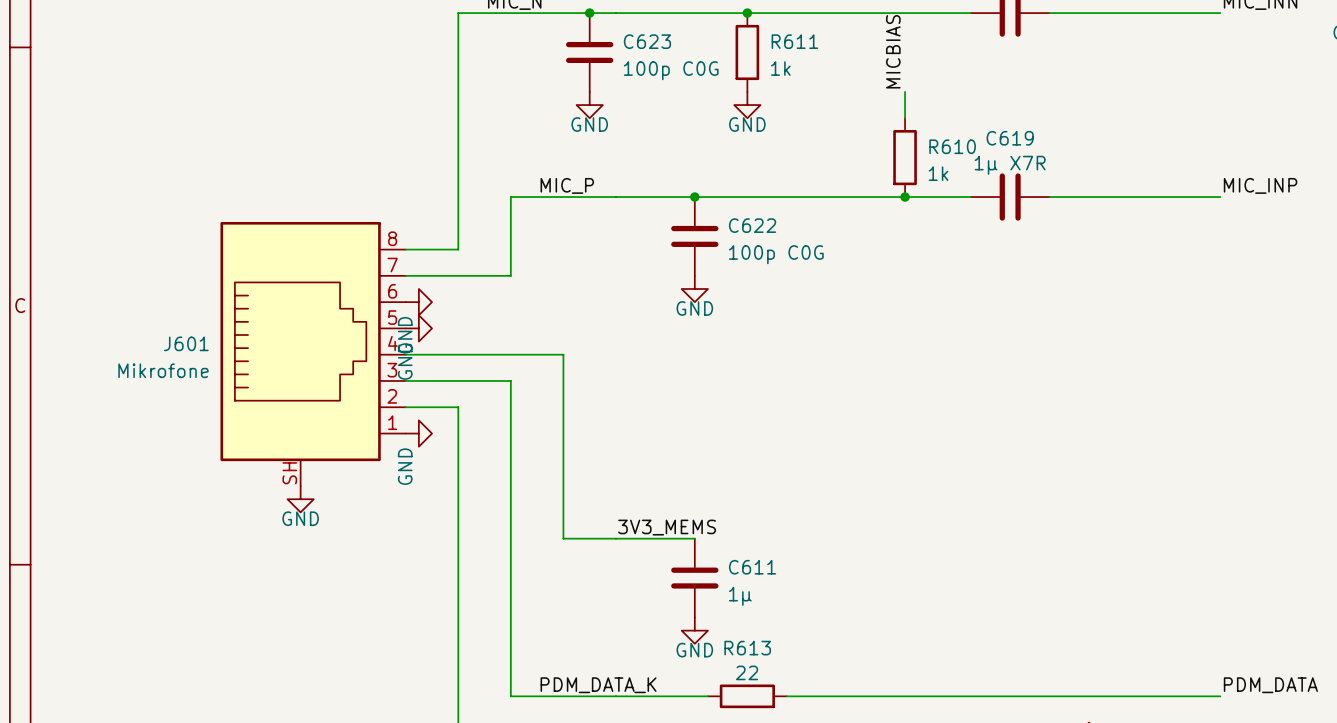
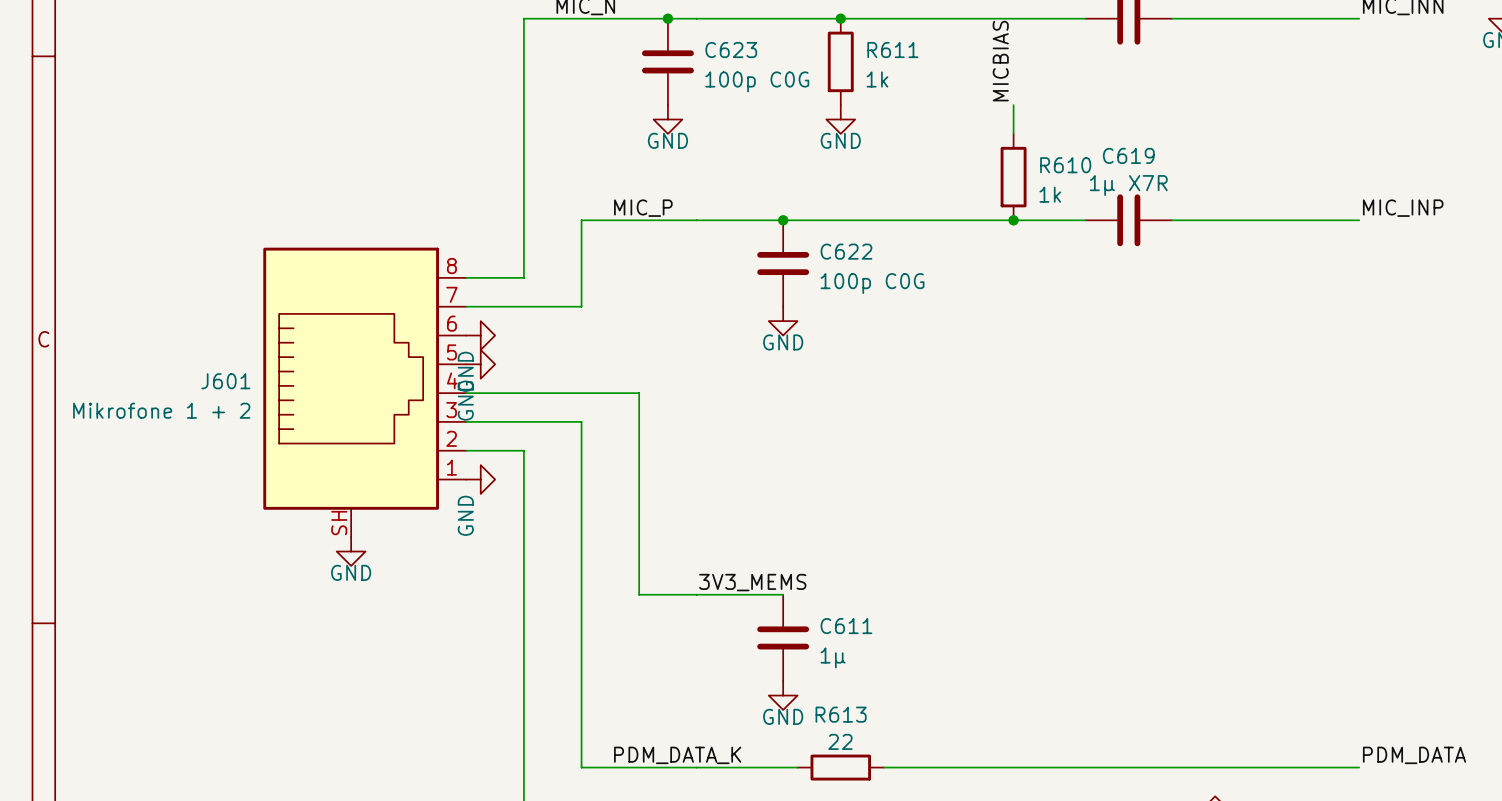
J601 value: Mikrofone (163, 370) -> Mikrofone 1 + 2 (161, 410)

